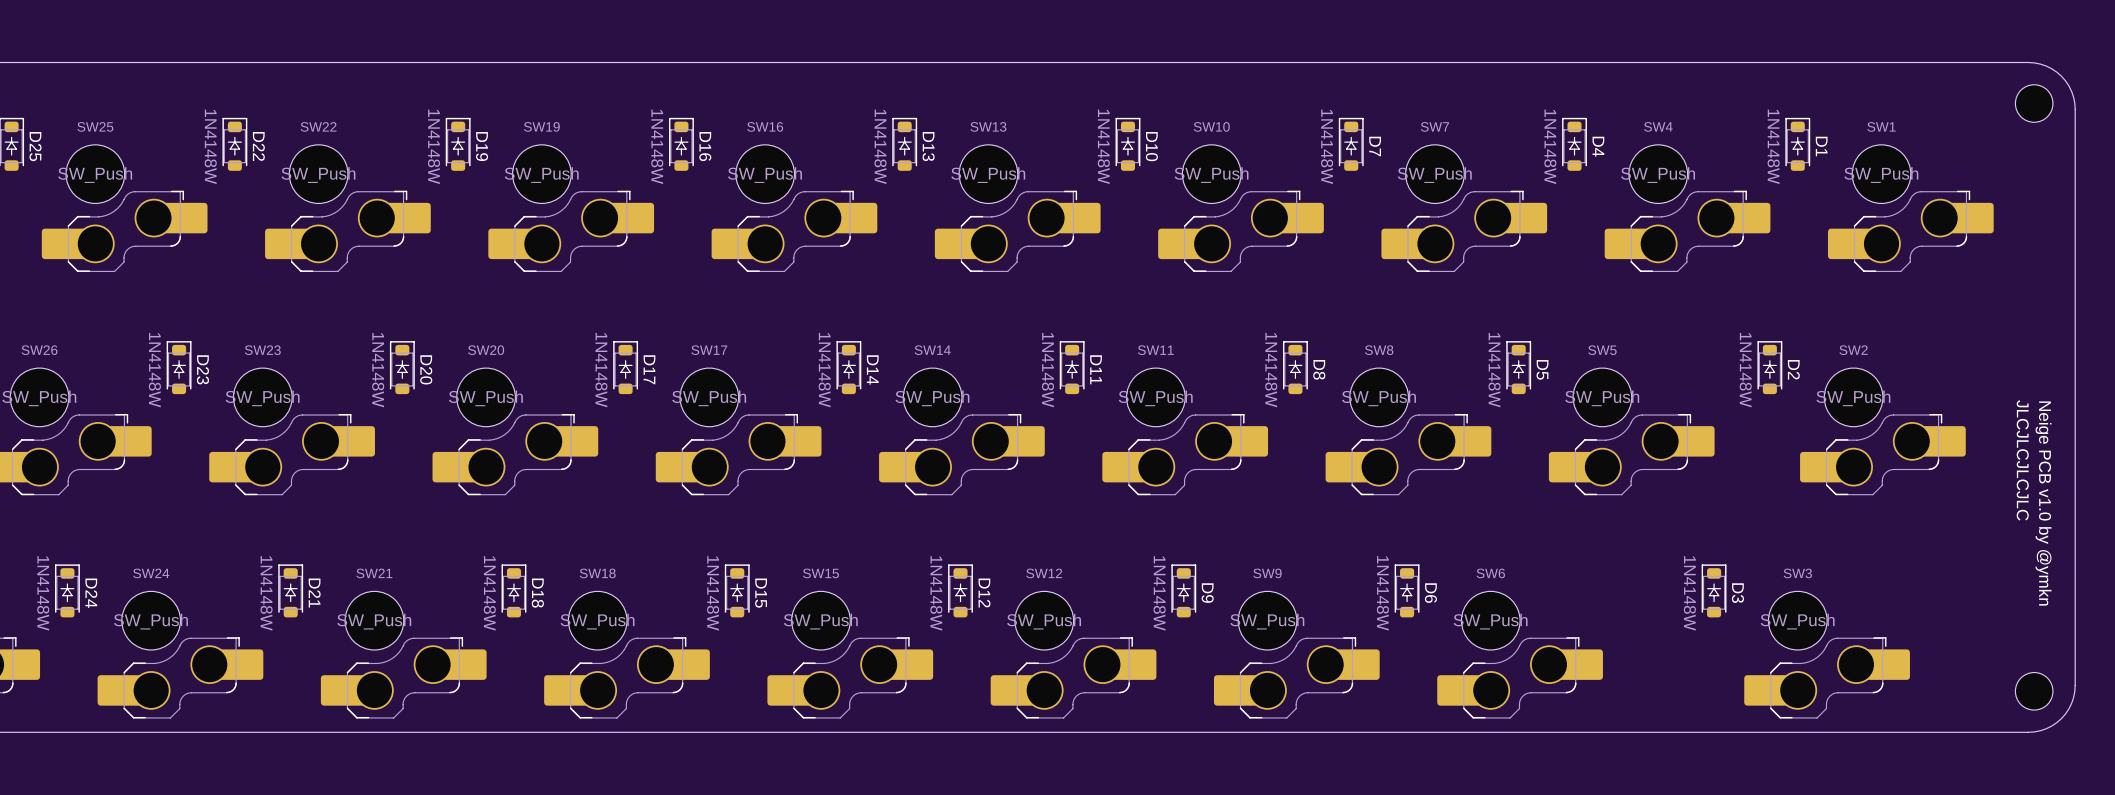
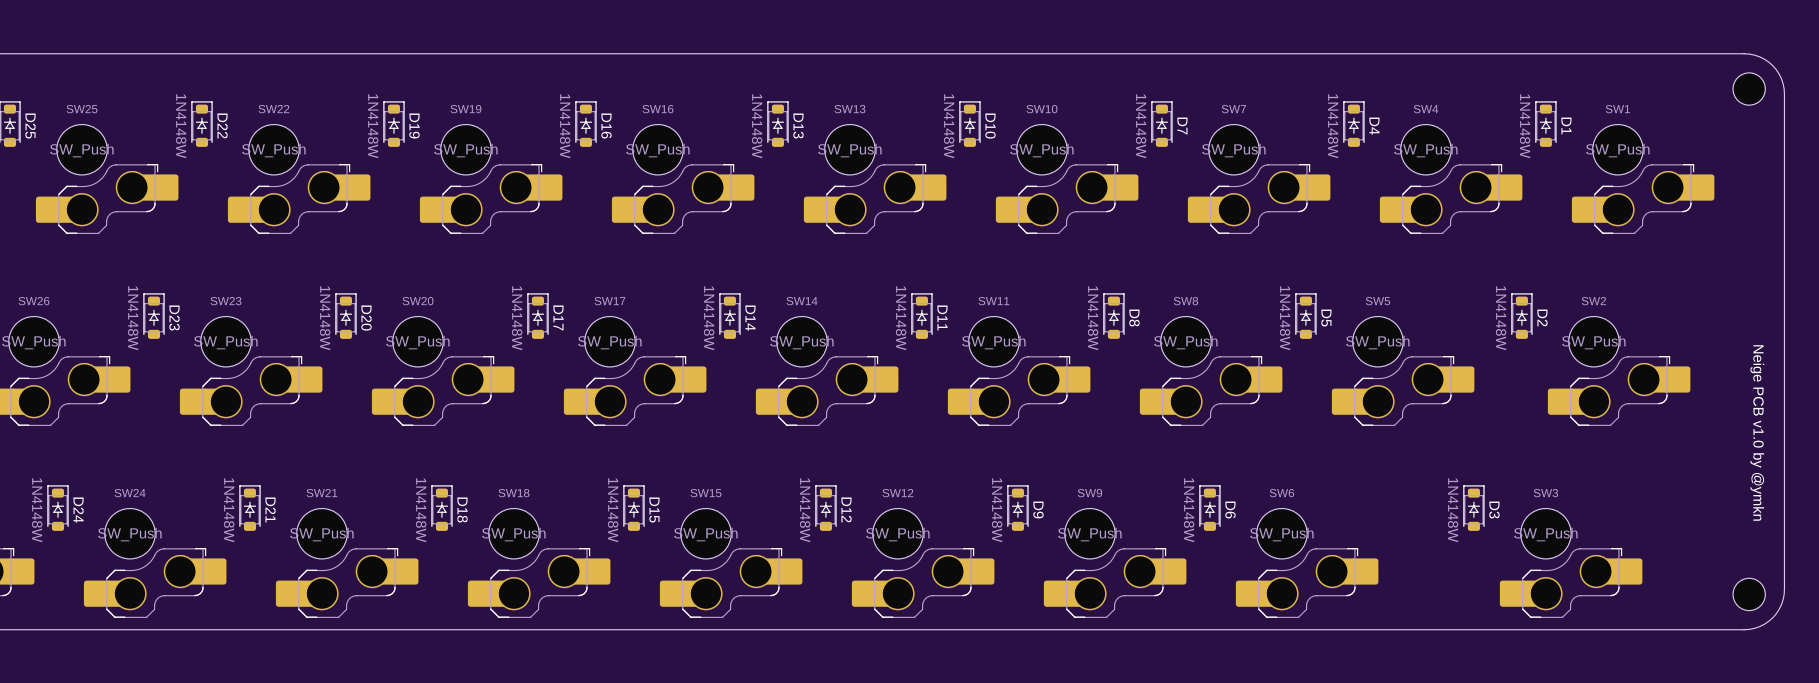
text: JLCJLCJLCJLC (2022, 460) -> none

